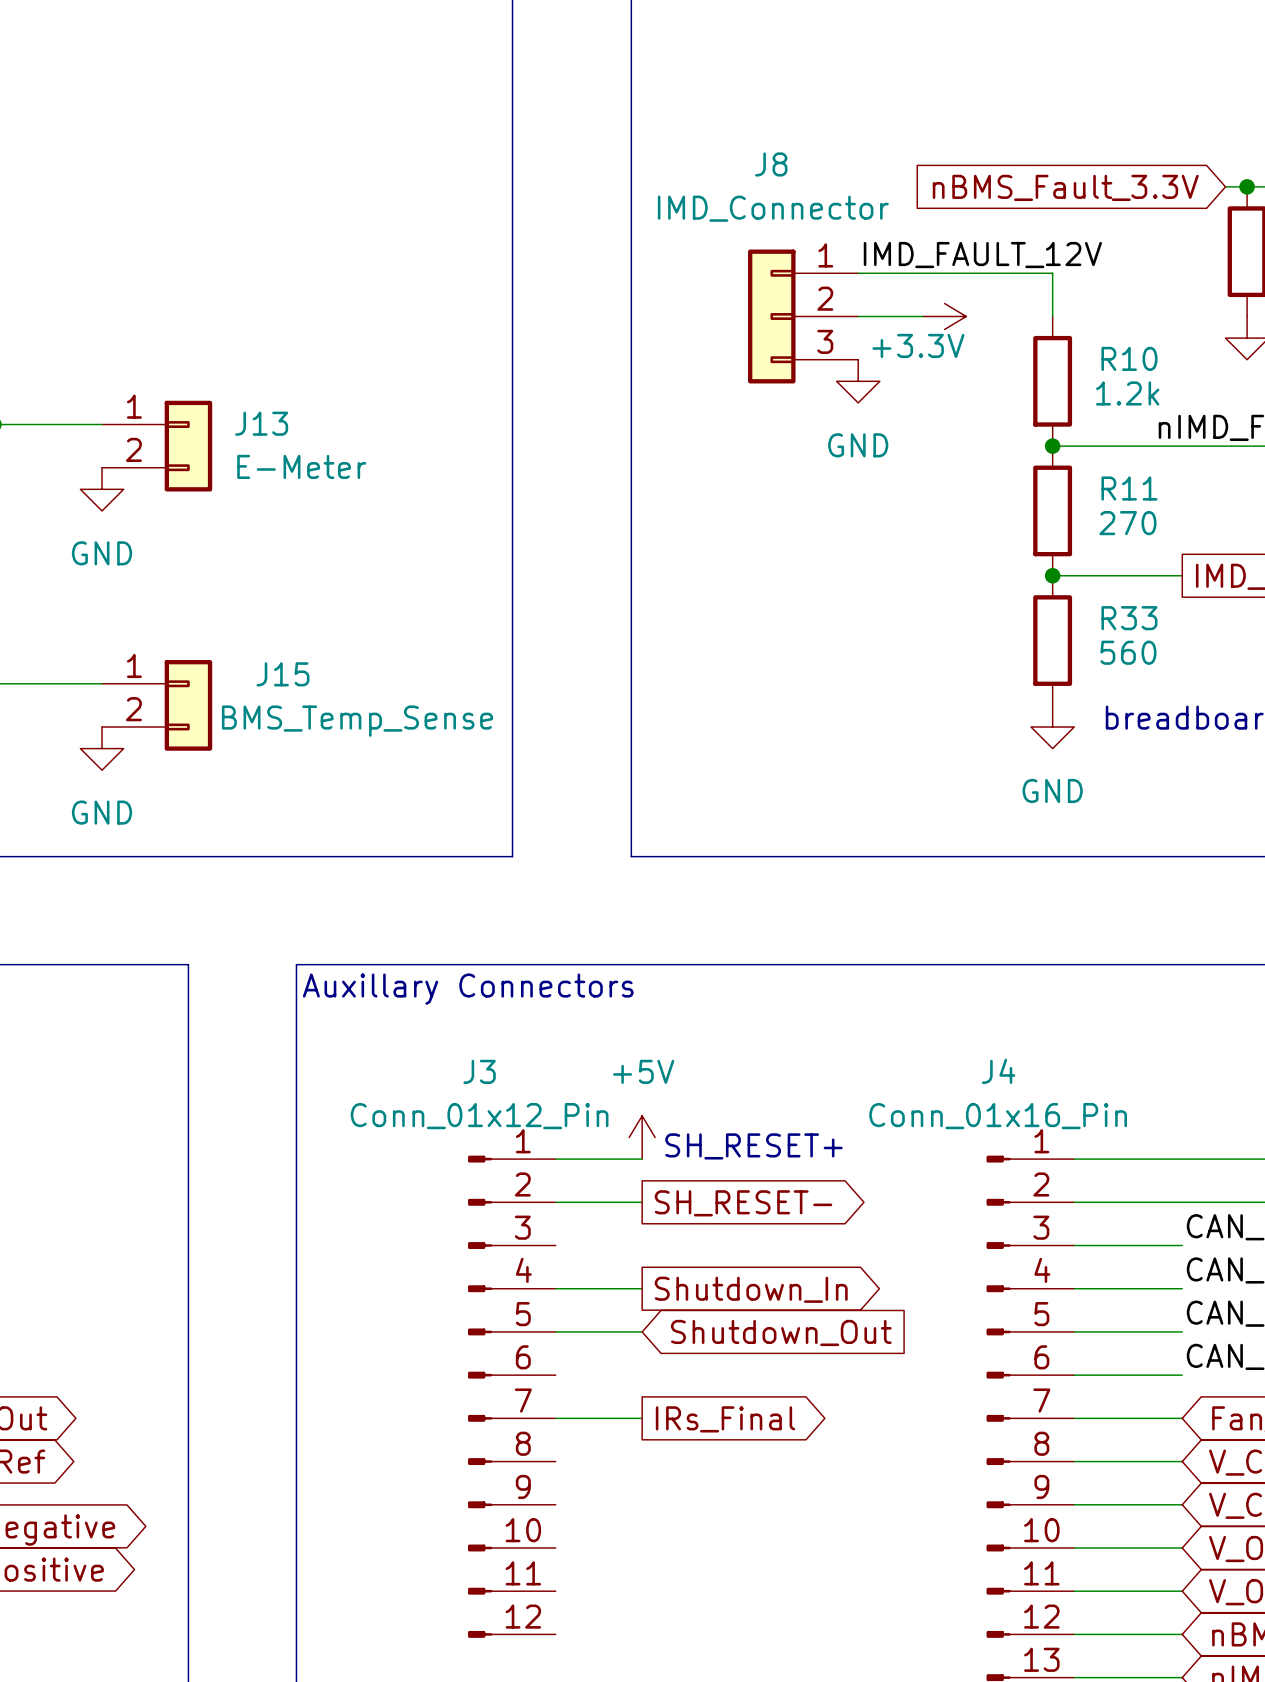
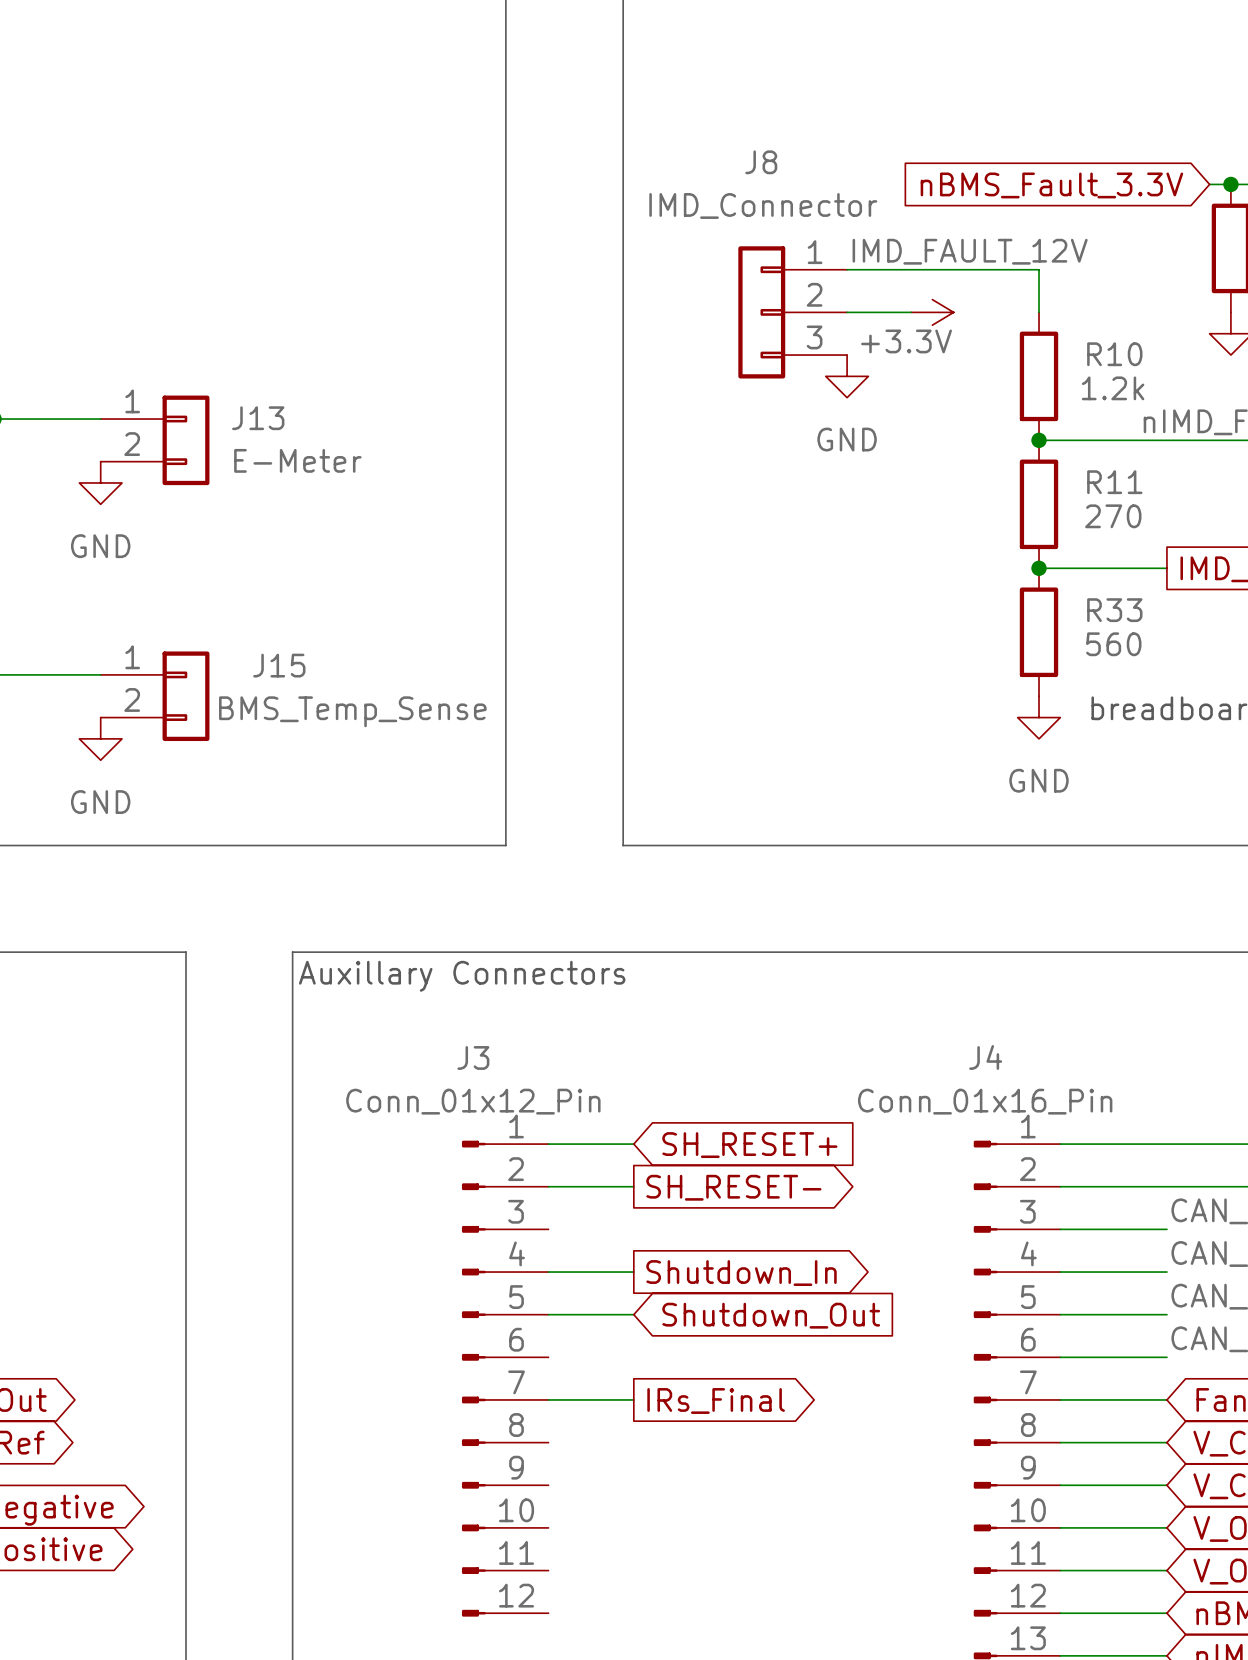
power symbol: +5V (642, 1137) -> none
text: SH_RESET+ (753, 1146) -> none
global label: none -> SH_RESET+ (749, 1145)

